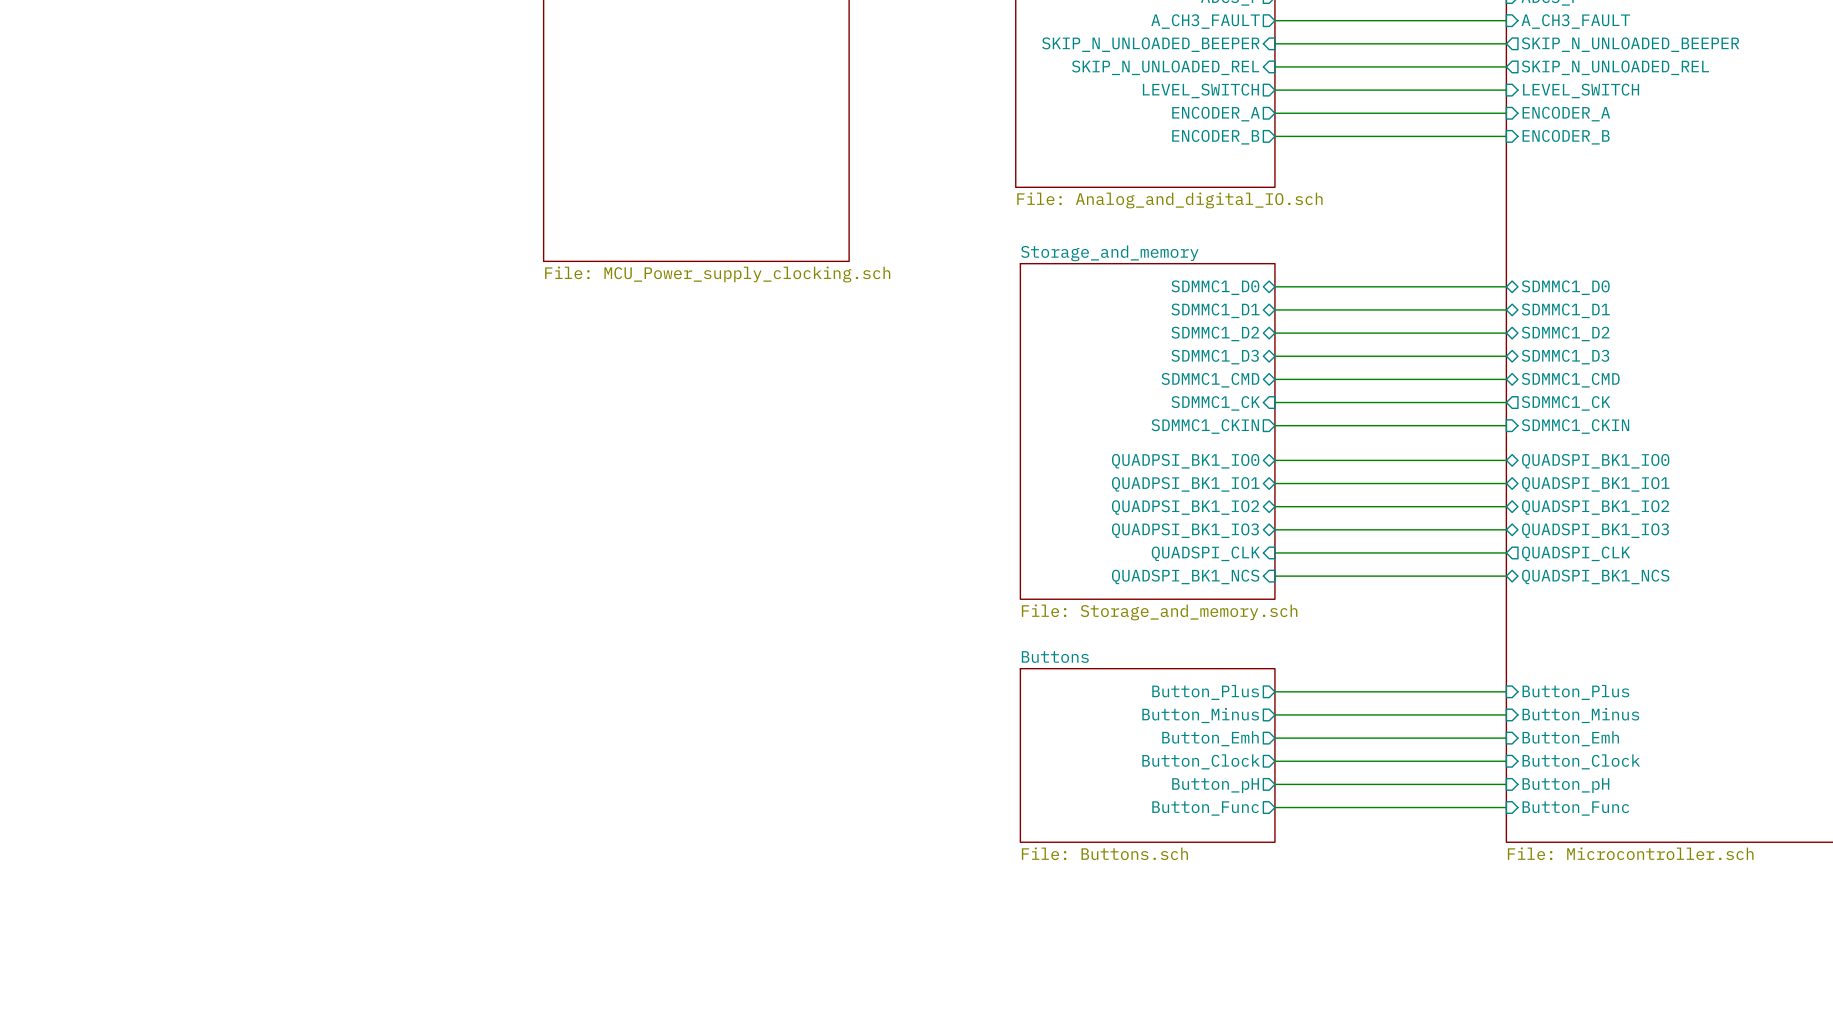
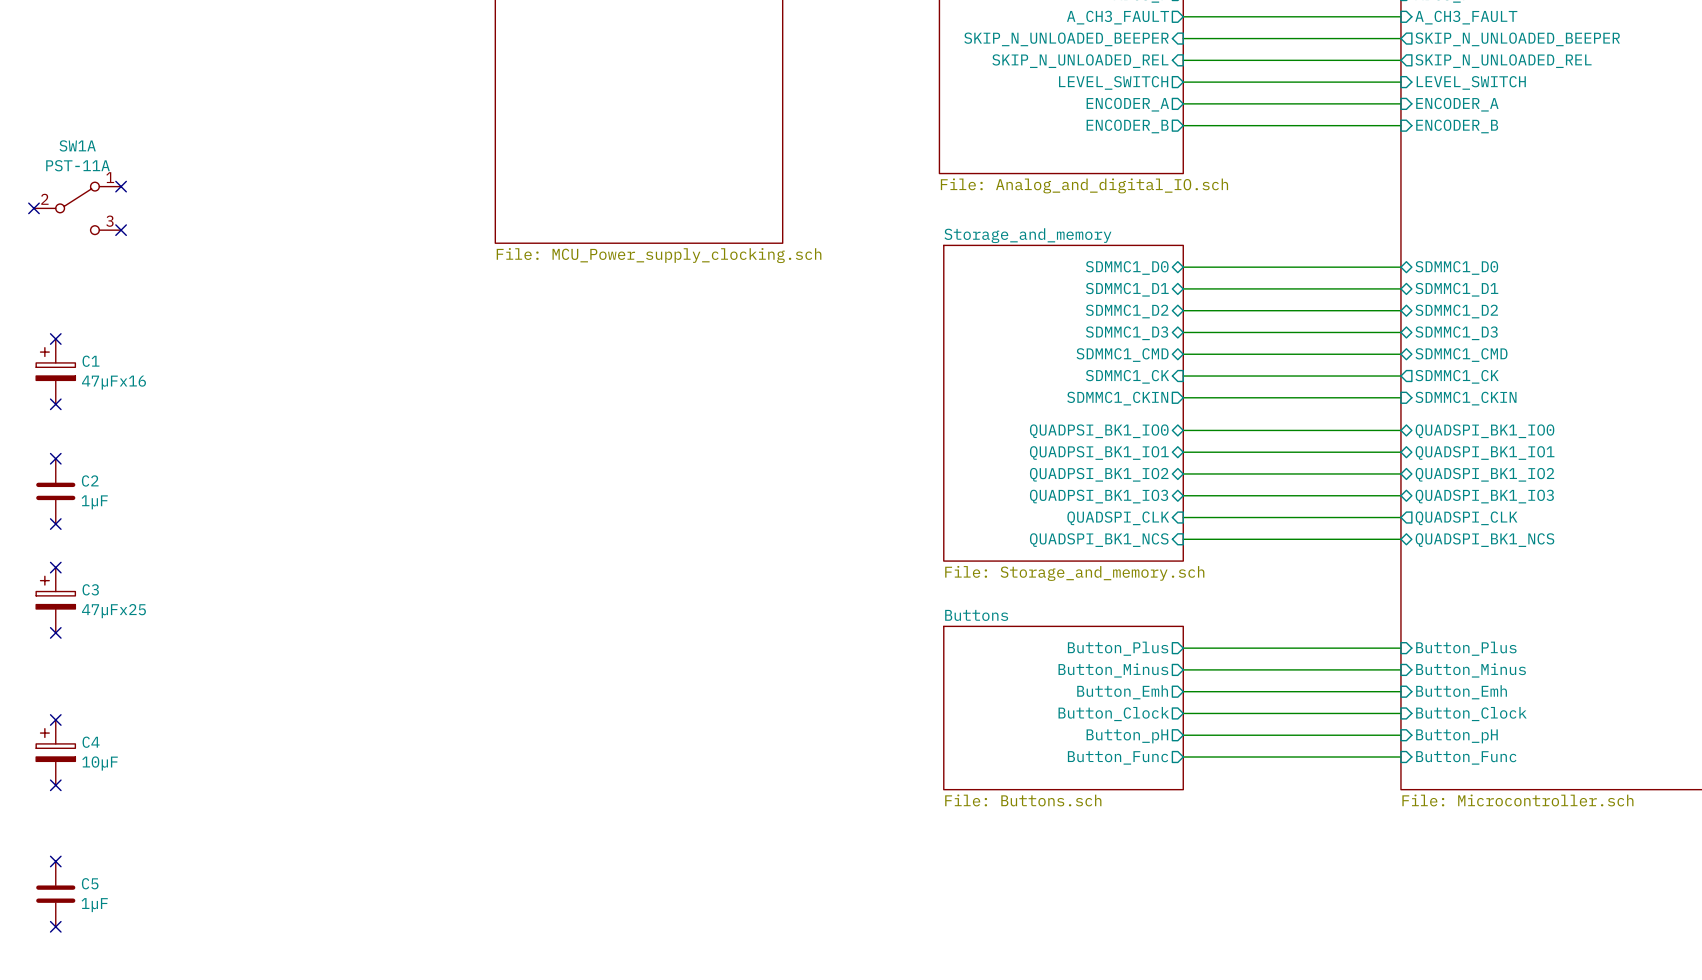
no-connect mark: none -> (121, 186)
no-connect mark: none -> (33, 208)
SW1A: none -> PST-11A (77, 208)
no-connect mark: none -> (121, 230)
no-connect mark: none -> (55, 339)
C1: none -> 47µFx16 (55, 371)
no-connect mark: none -> (55, 404)
no-connect mark: none -> (55, 458)
C2: none -> 1µF (55, 491)
no-connect mark: none -> (55, 524)
no-connect mark: none -> (55, 567)
C3: none -> 47µFx25 (55, 600)
no-connect mark: none -> (55, 632)
no-connect mark: none -> (55, 719)
C4: none -> 10µF (55, 752)
no-connect mark: none -> (55, 785)
no-connect mark: none -> (55, 861)
C5: none -> 1µF (55, 894)
no-connect mark: none -> (55, 926)

